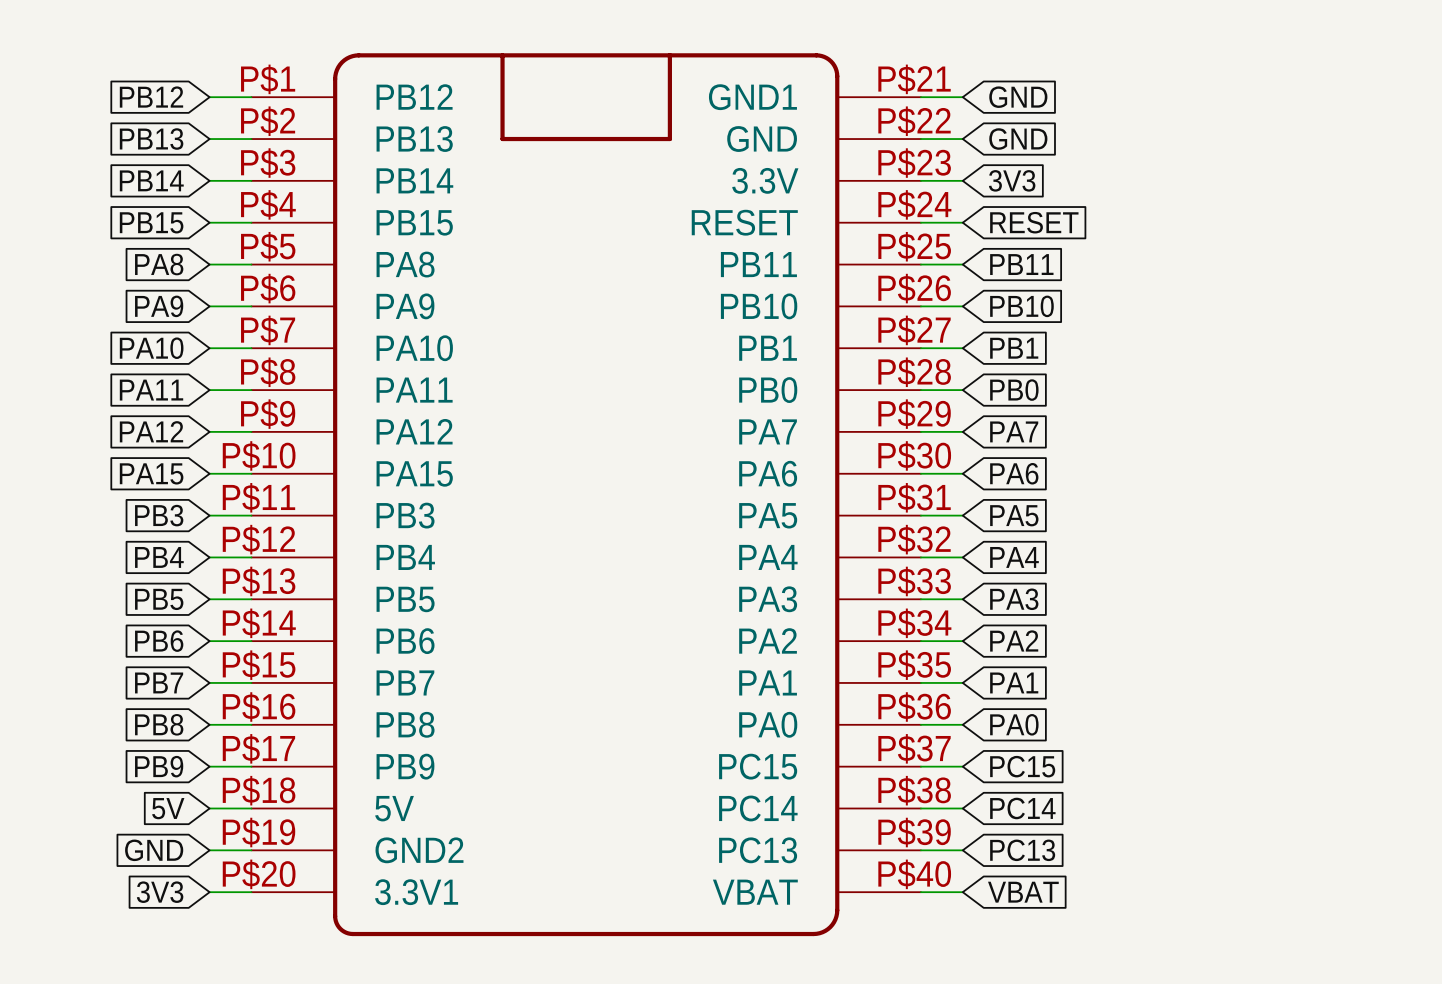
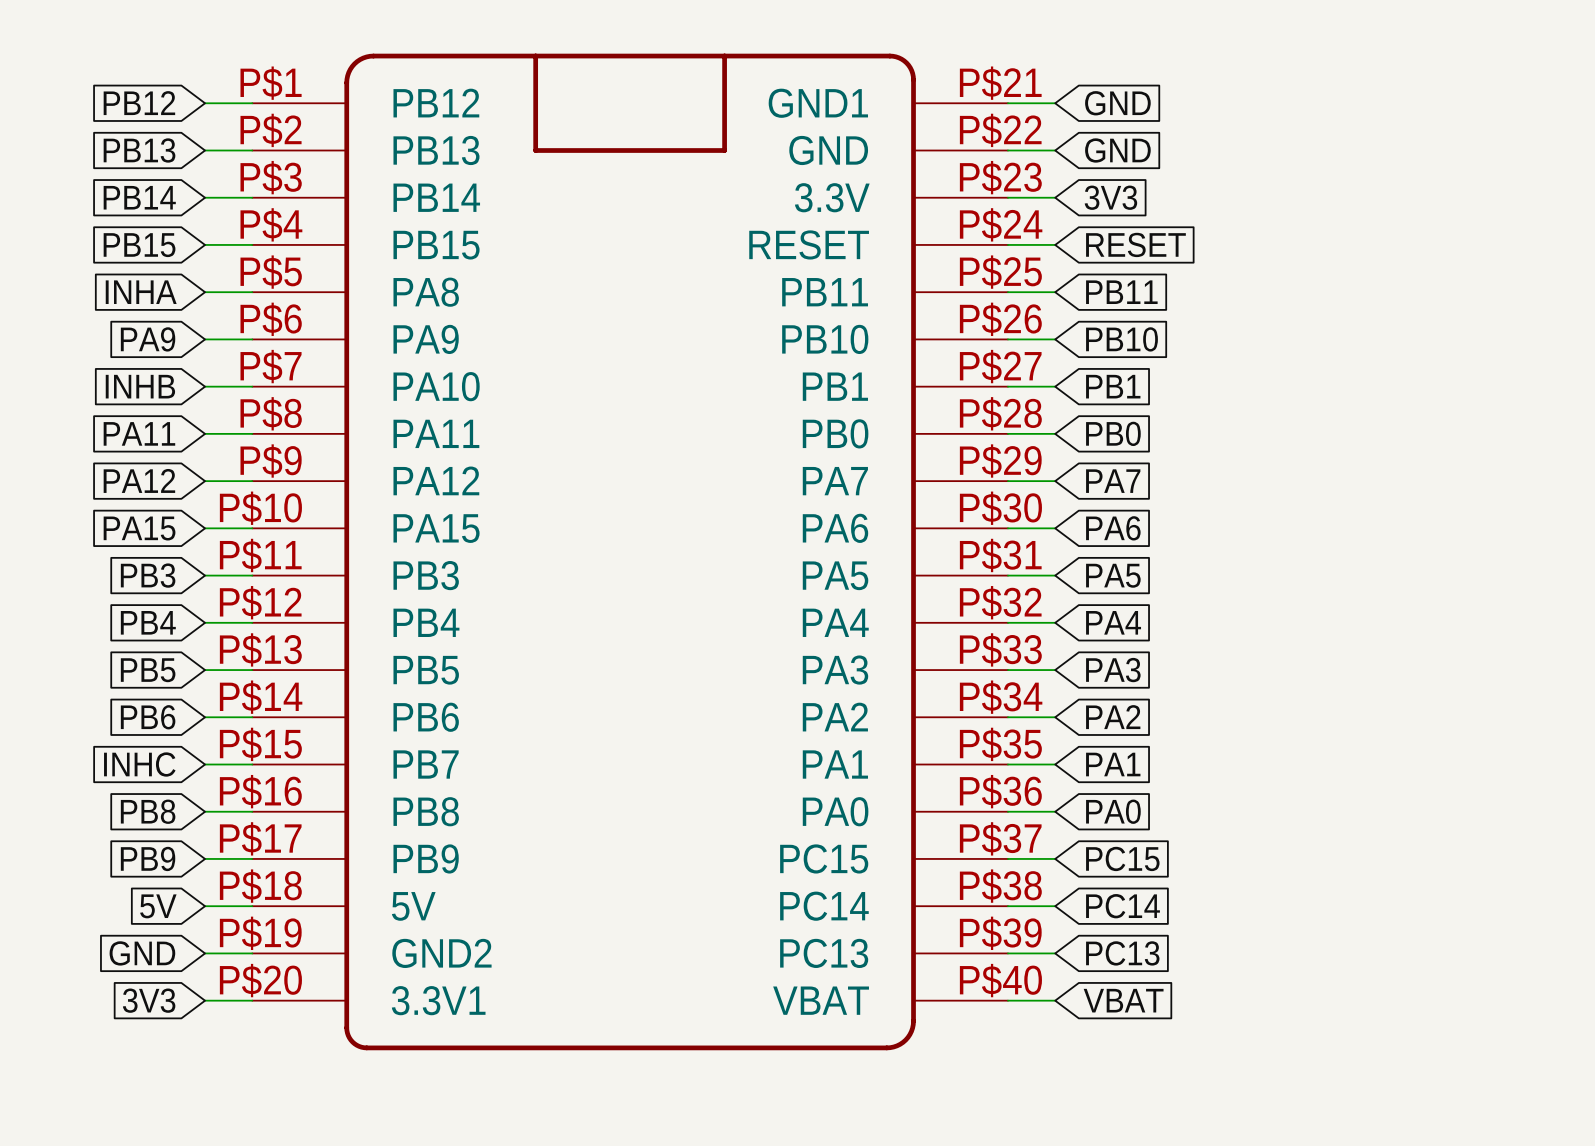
global label: PA8 (159, 264) -> INHA (141, 292)
global label: PA10 (151, 348) -> INHB (140, 386)
global label: PB7 (159, 682) -> INHC (139, 764)

